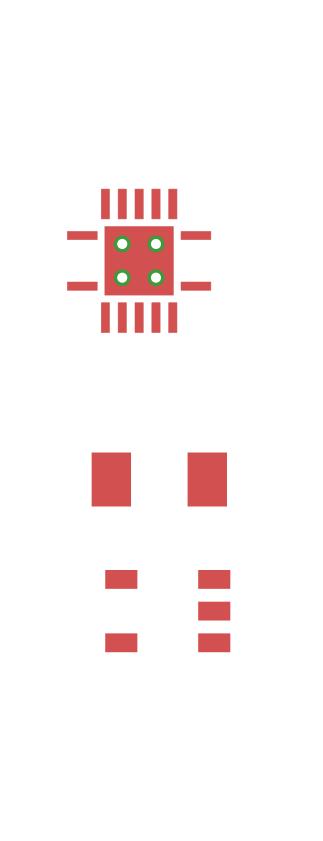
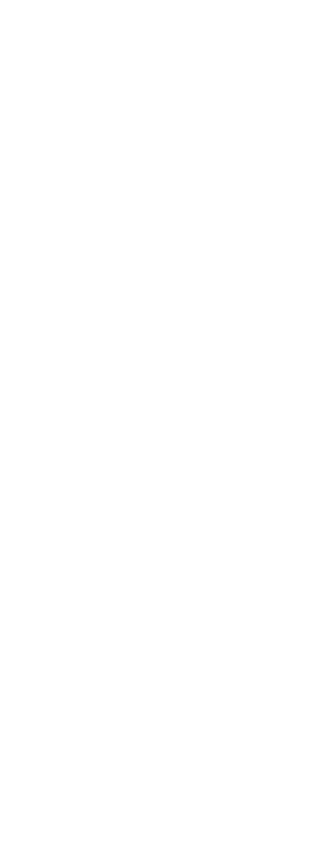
part: (139, 260) -> none
part: (159, 479) -> none
part: (167, 611) -> none

